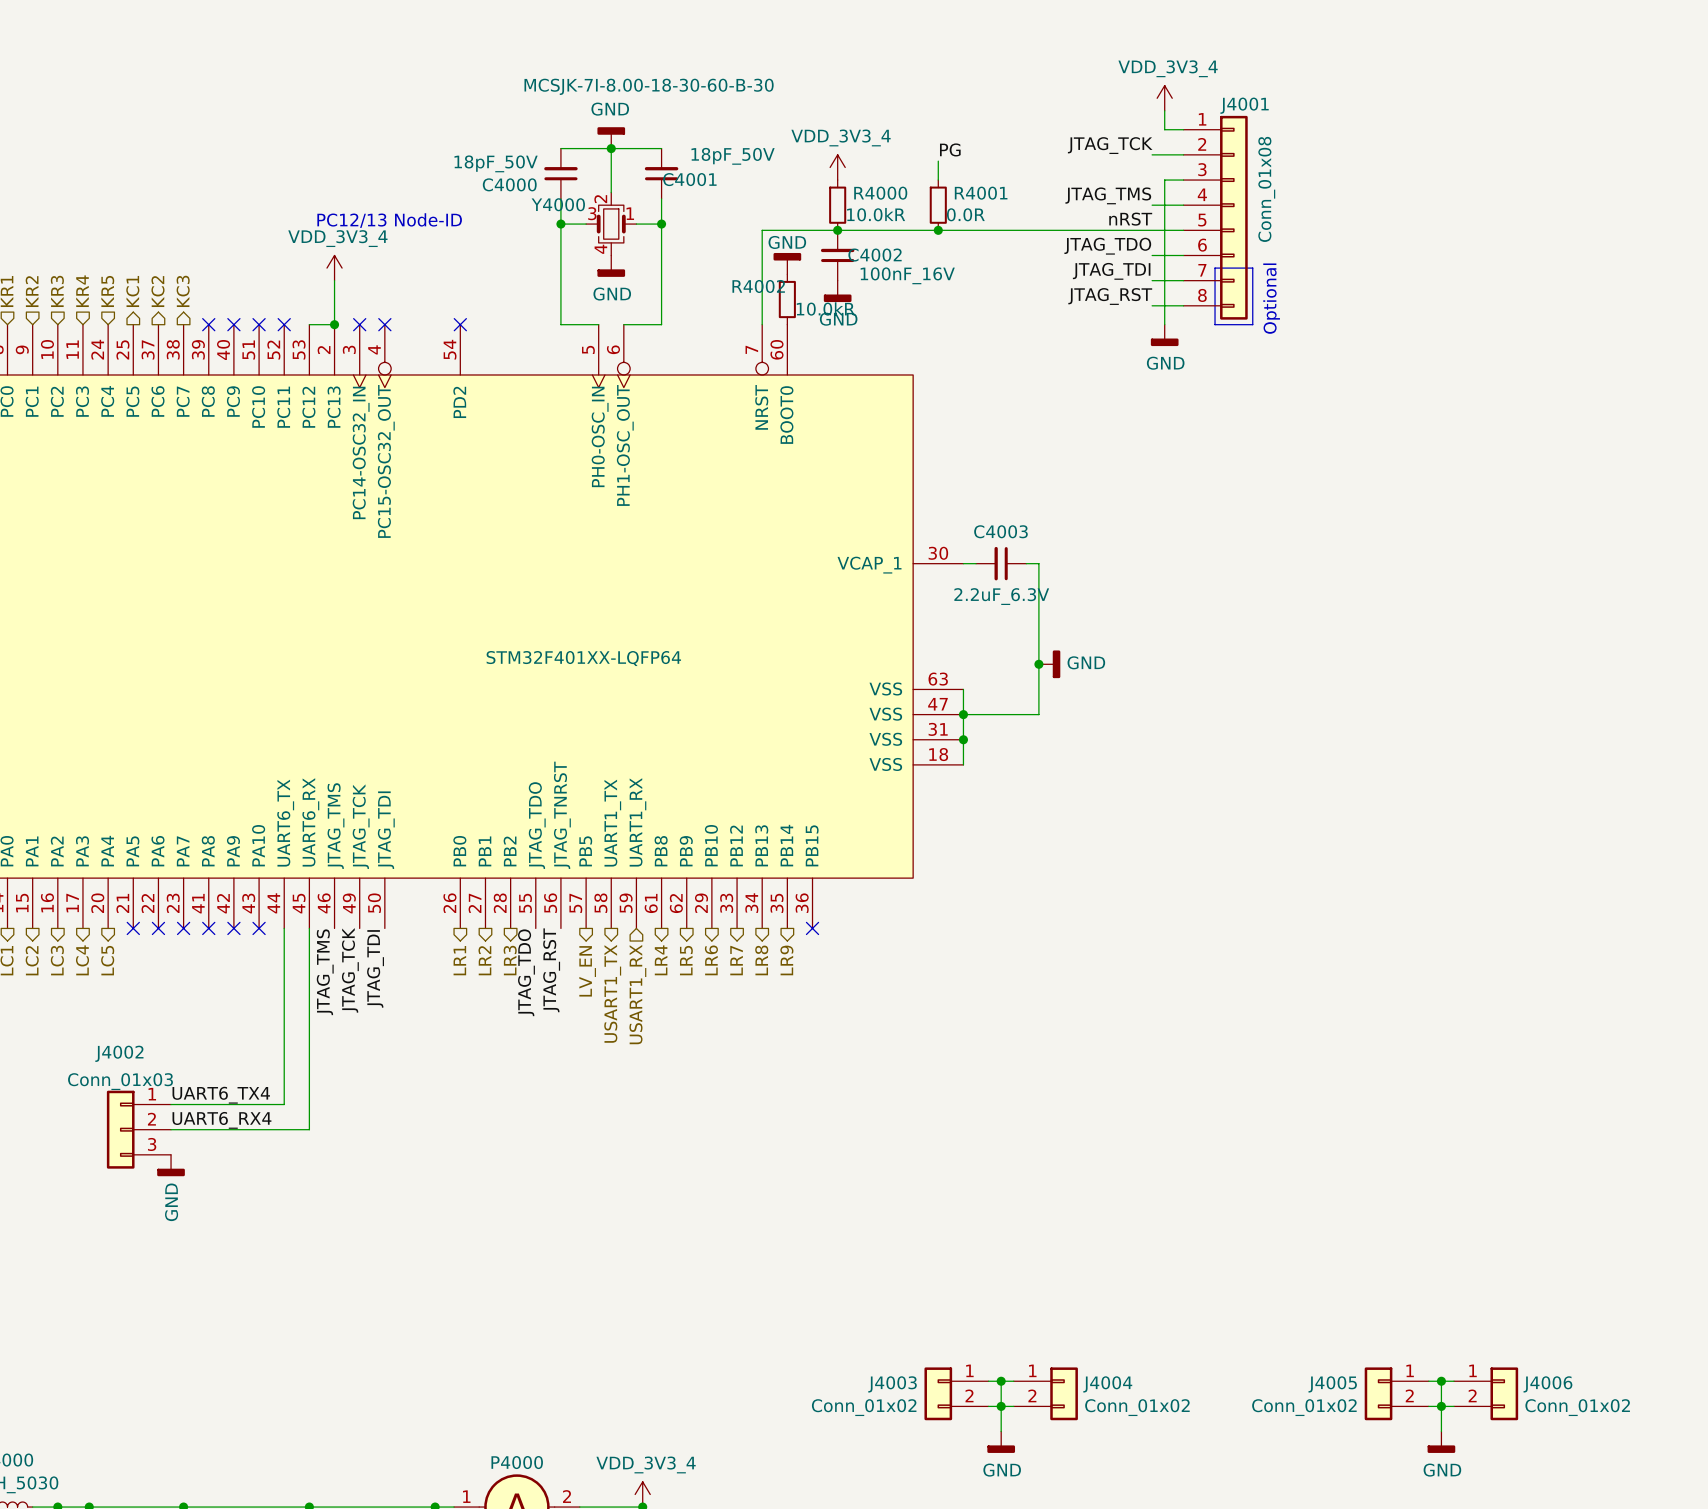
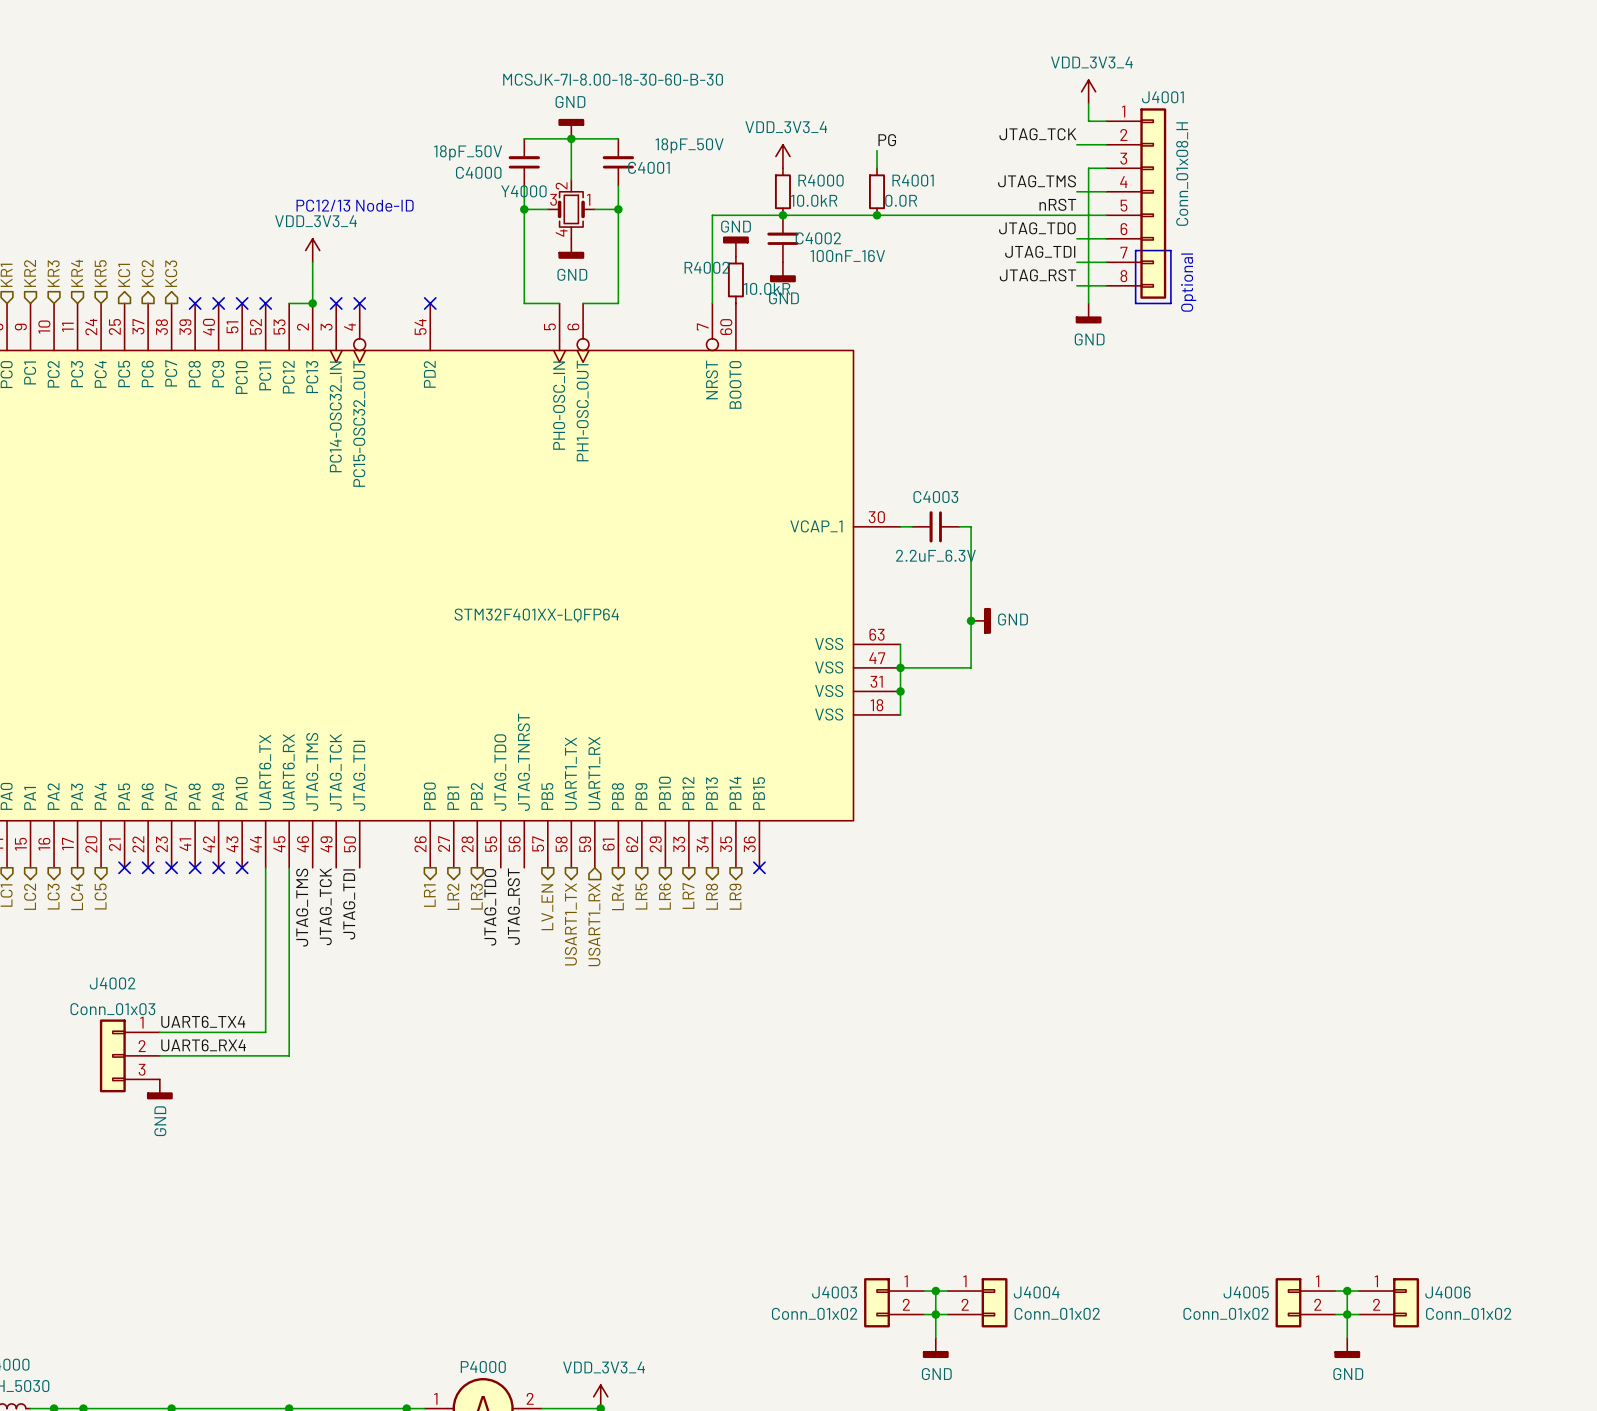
J4001 value: Conn_01x08 (1266, 189) -> Conn_01x08_H (1182, 174)

